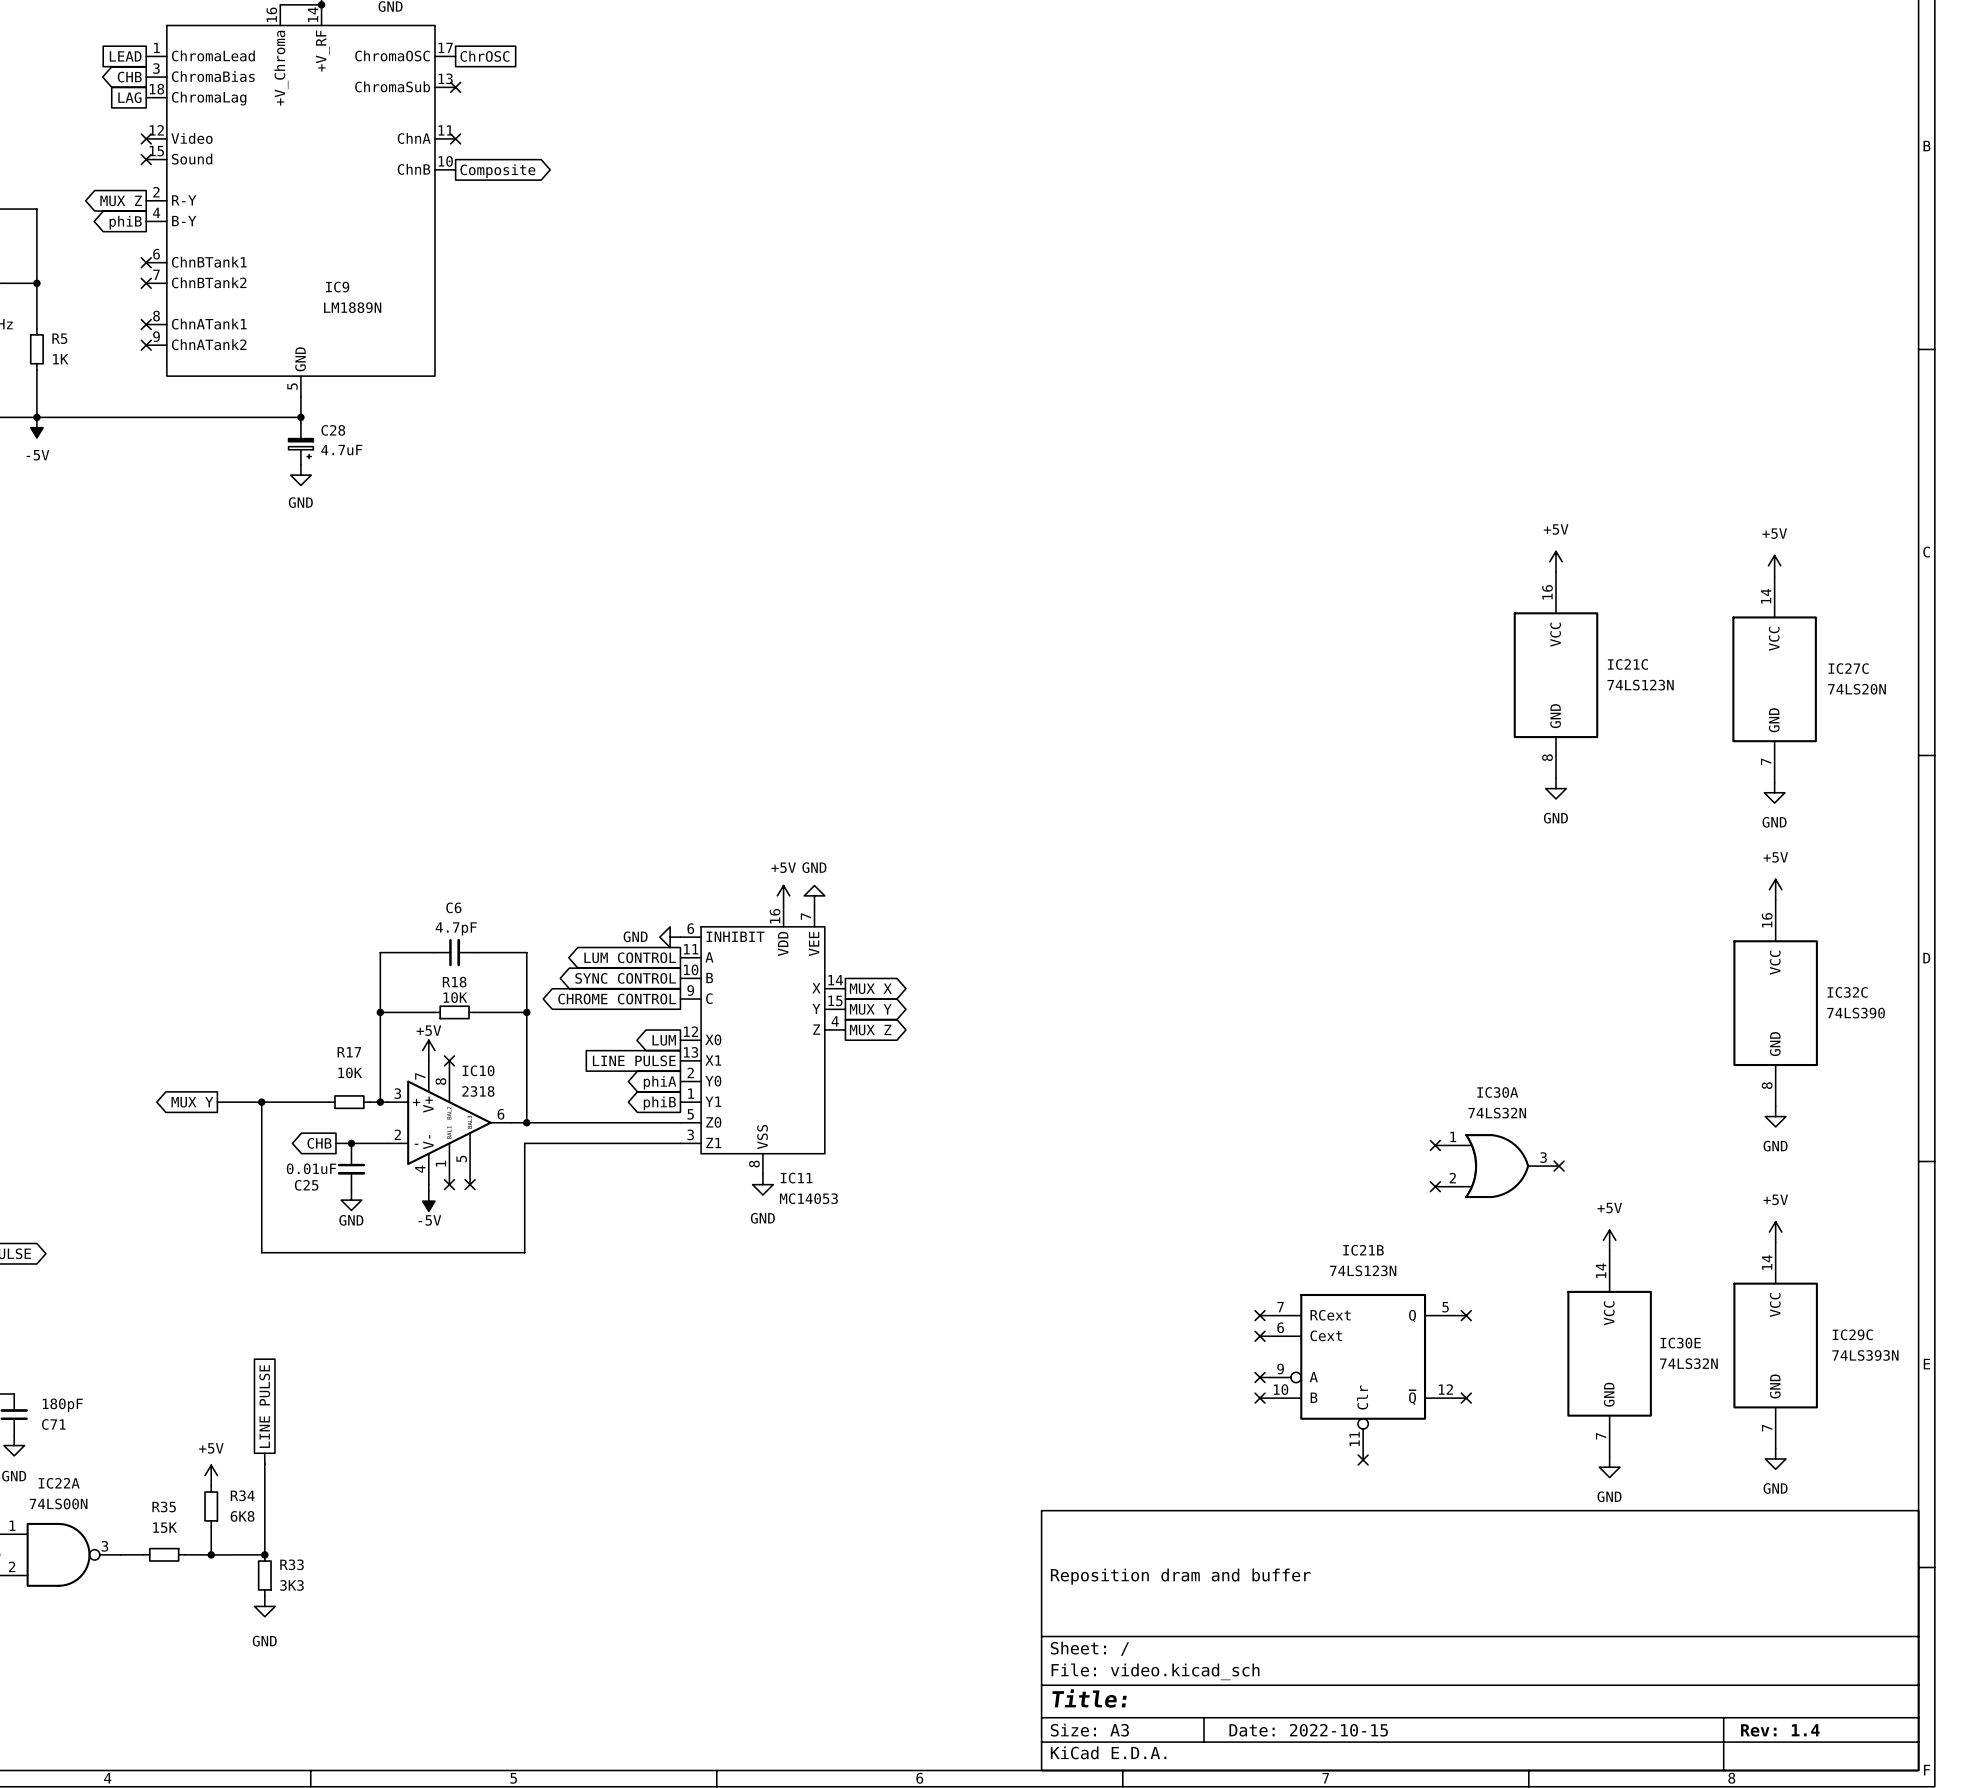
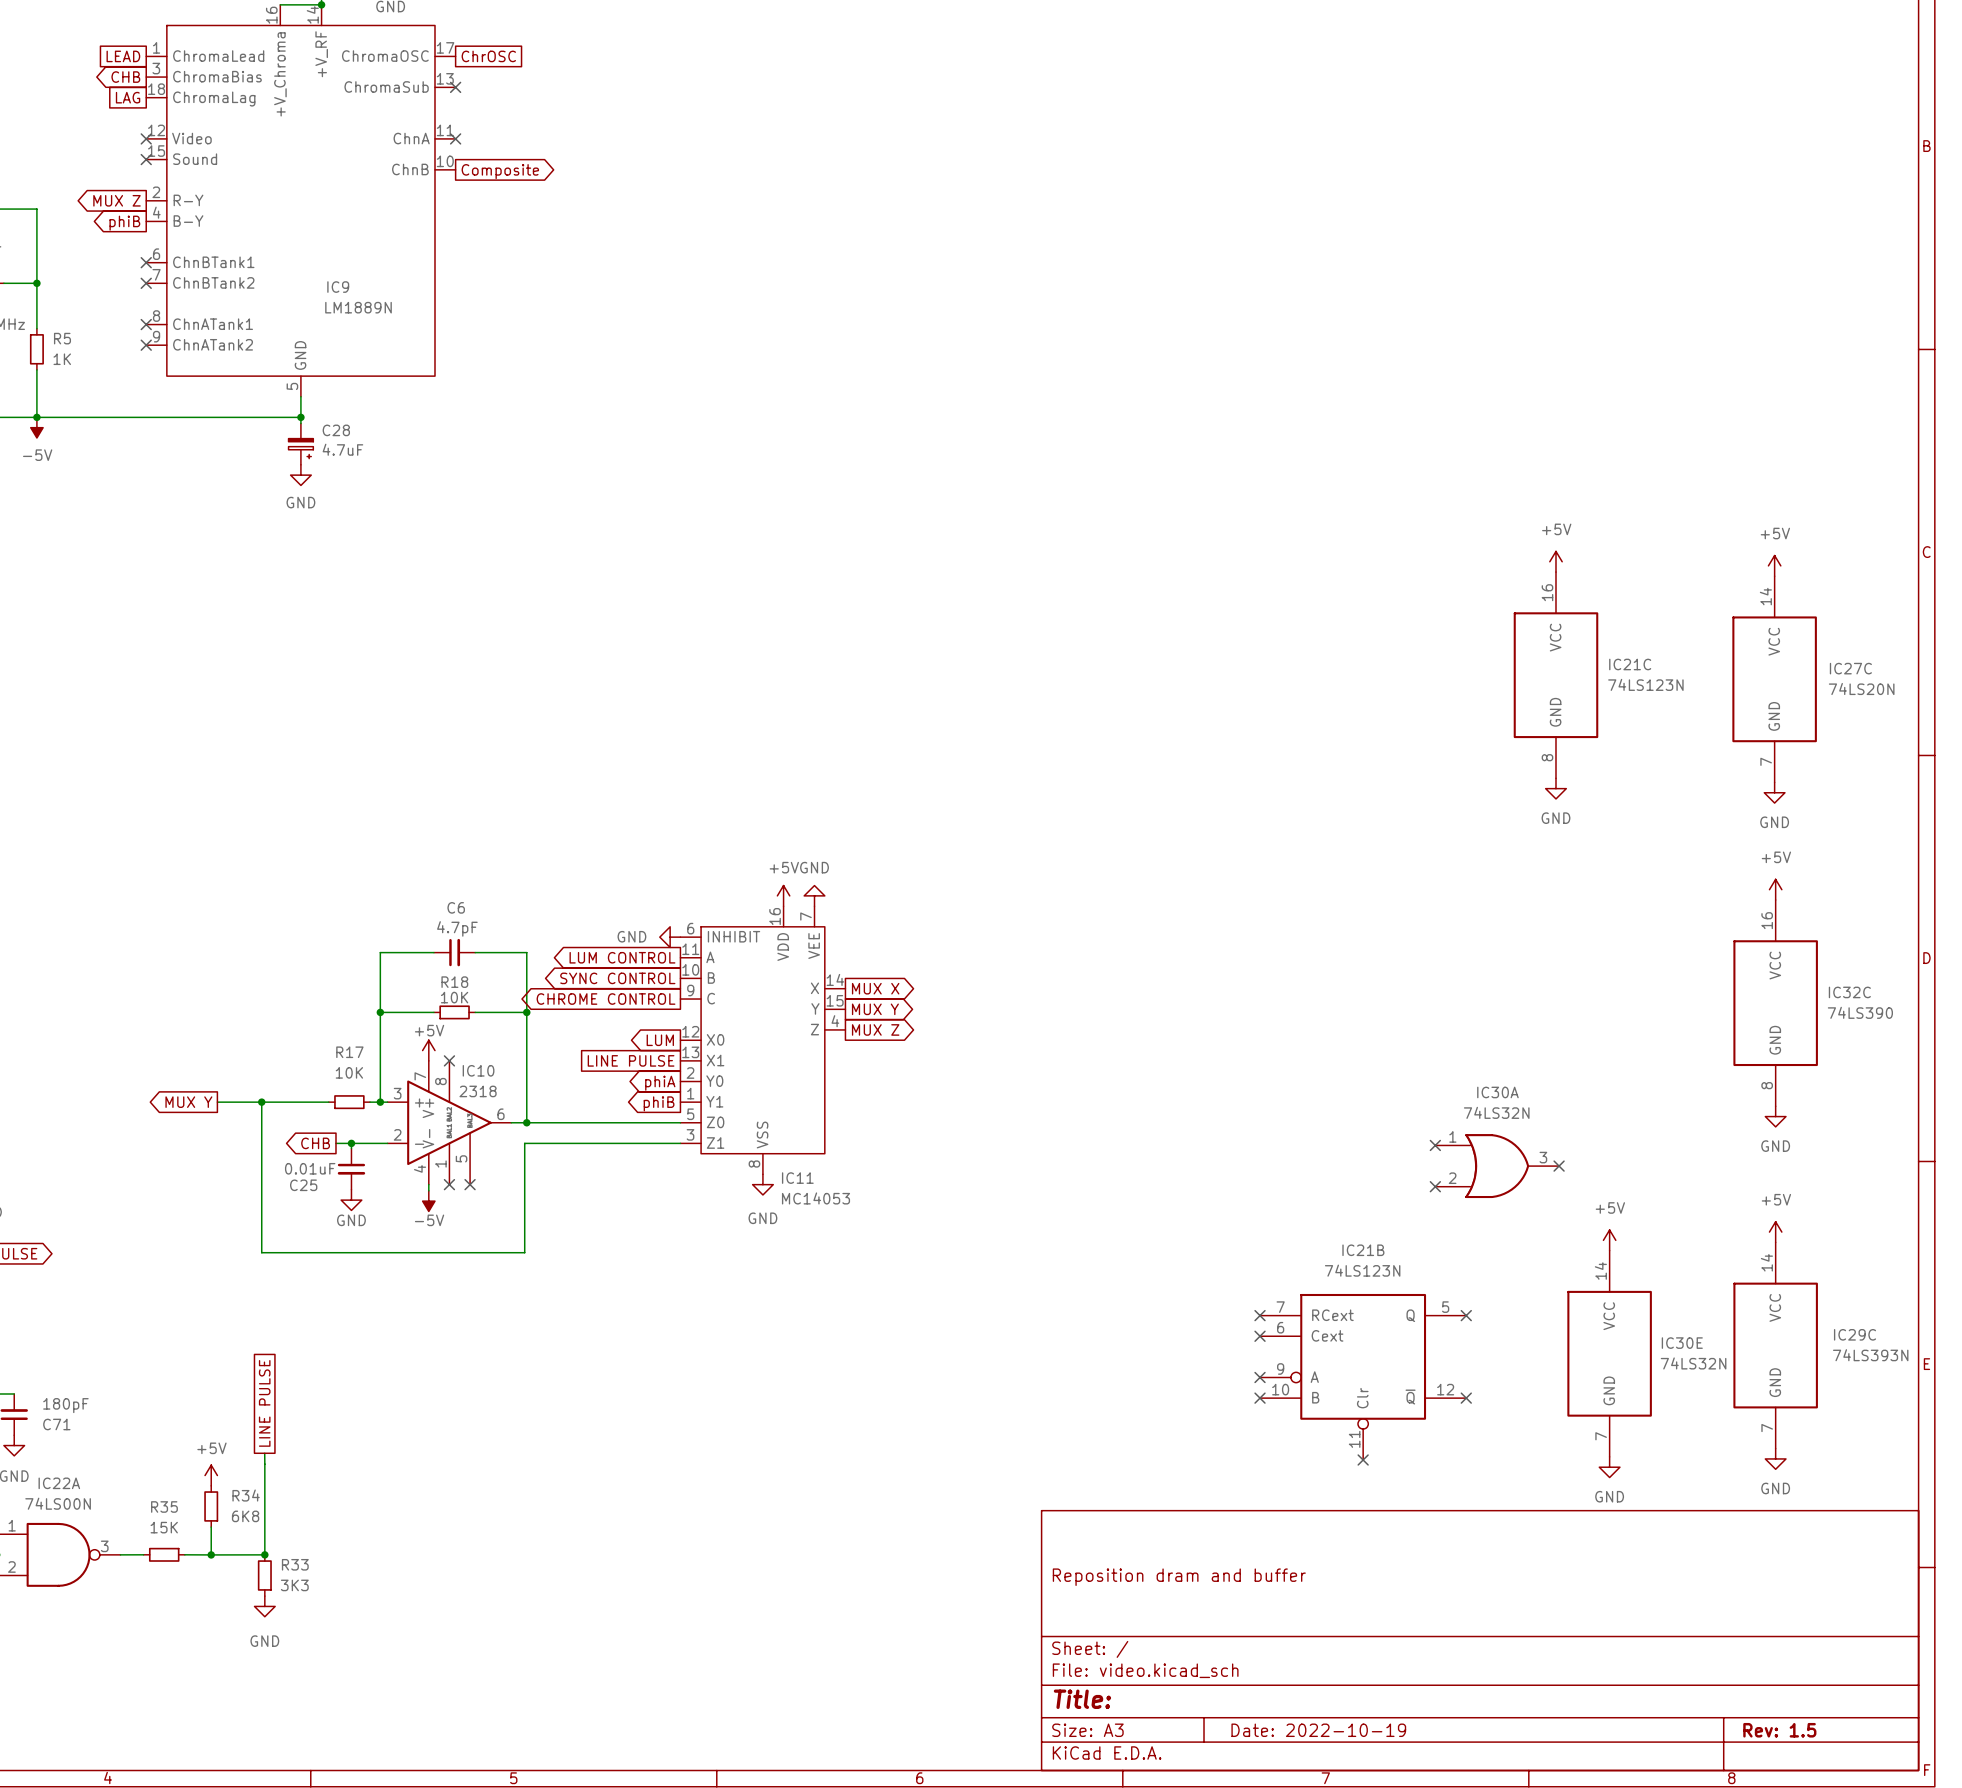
title block: Date: 2022-10-15 (1308, 1730) -> Date: 2022-10-19 (1318, 1730)
title block: Rev: 1.4 (1780, 1730) -> Rev: 1.5 (1779, 1730)

